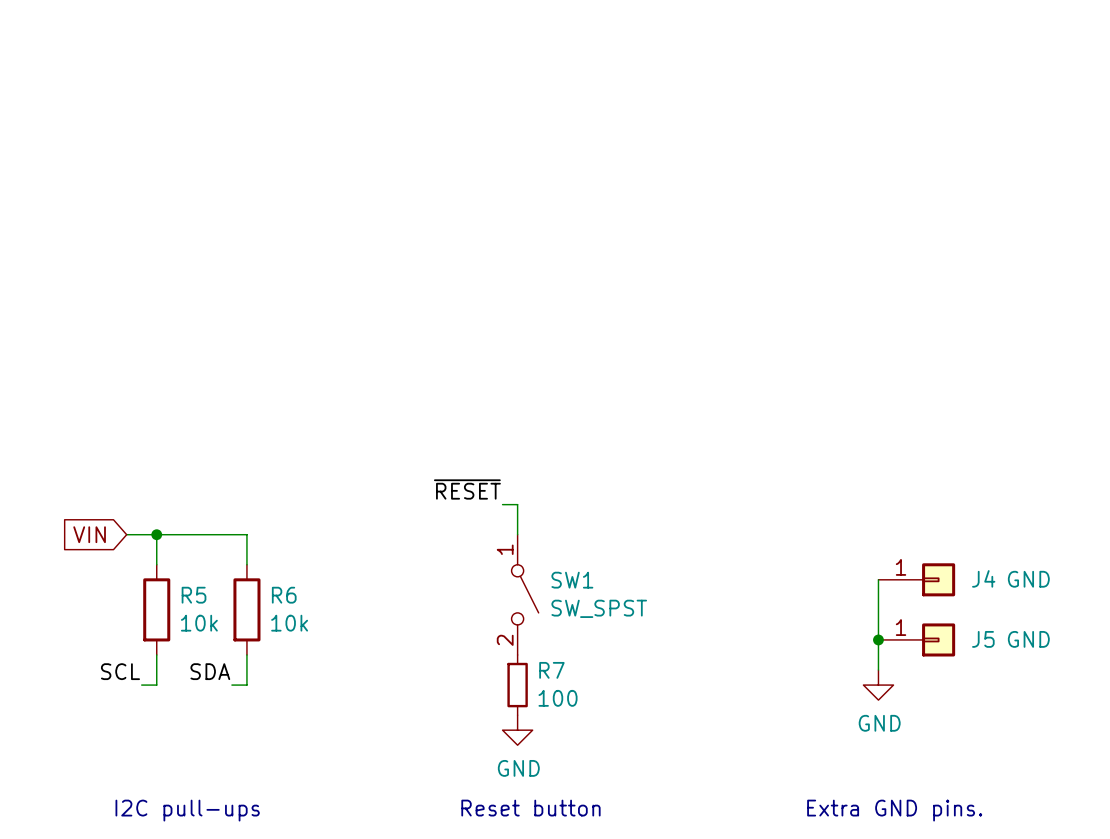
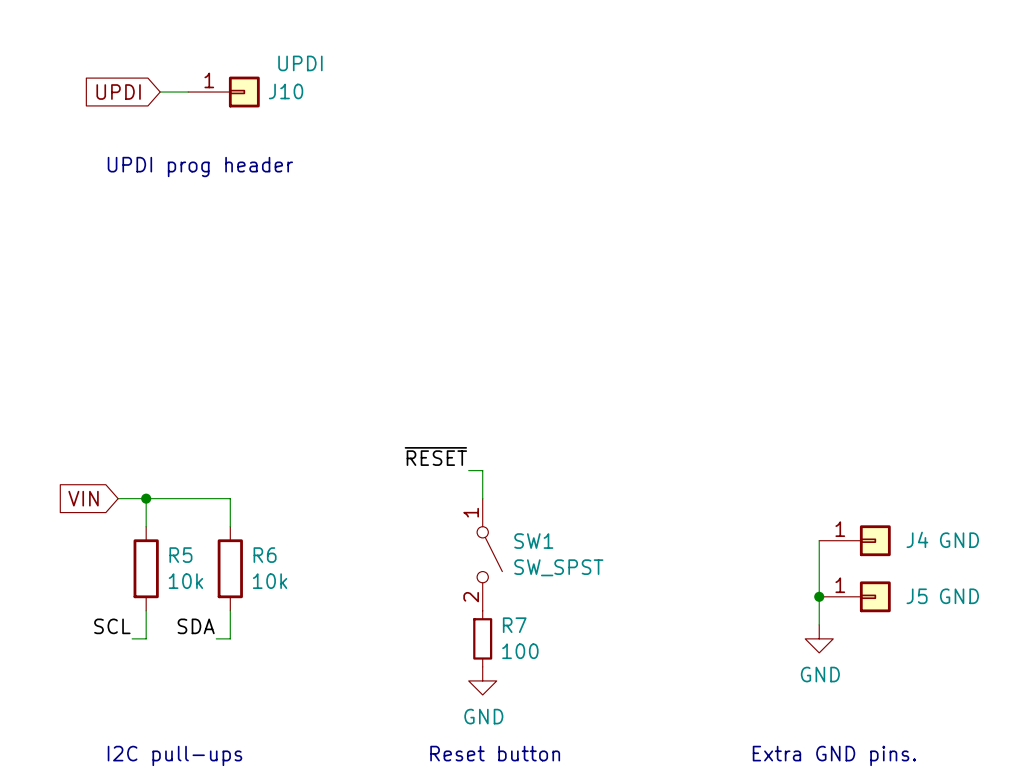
global label: none -> UPDI (118, 92)
wire: none -> (160, 92) (188, 92)
J10: none -> UPDI (224, 92)
text: none -> UPDI prog header (200, 167)

